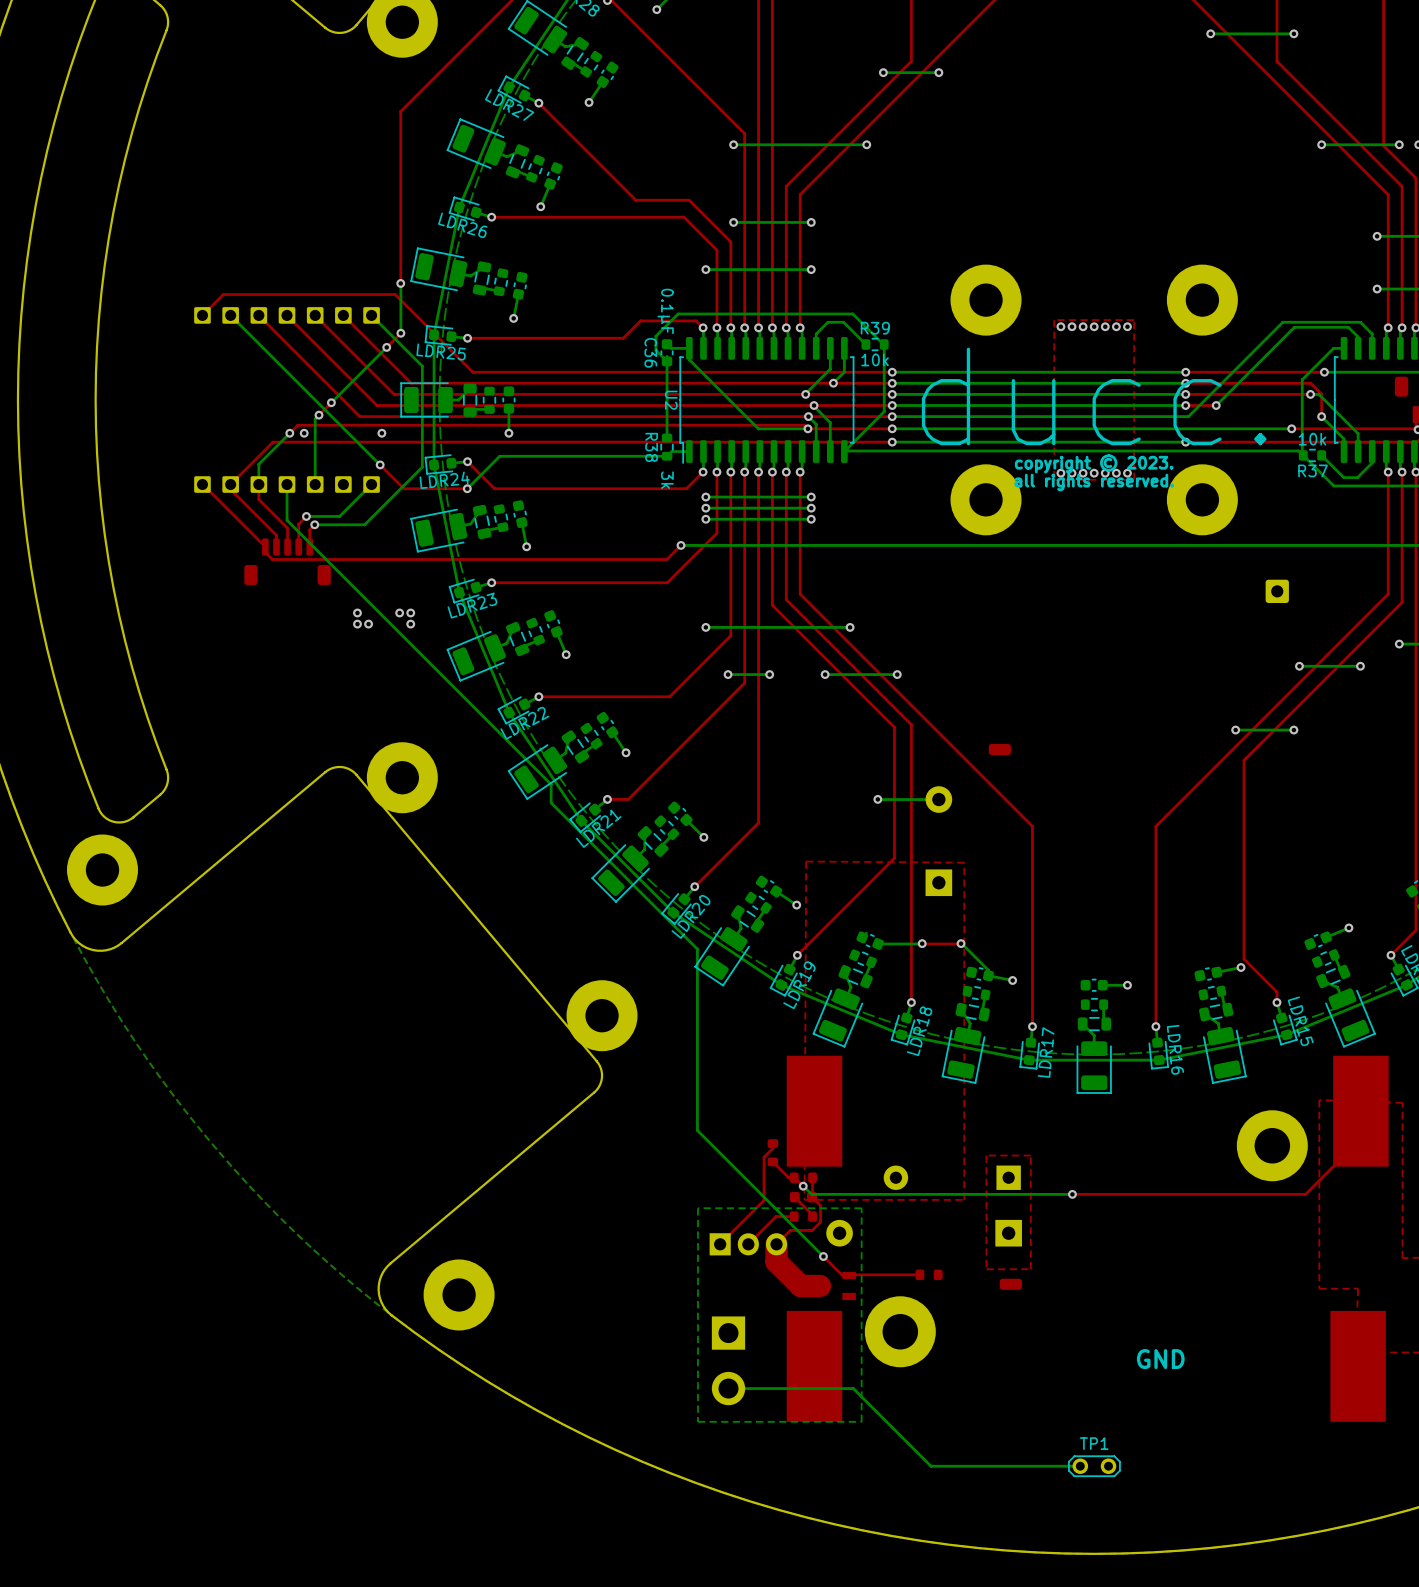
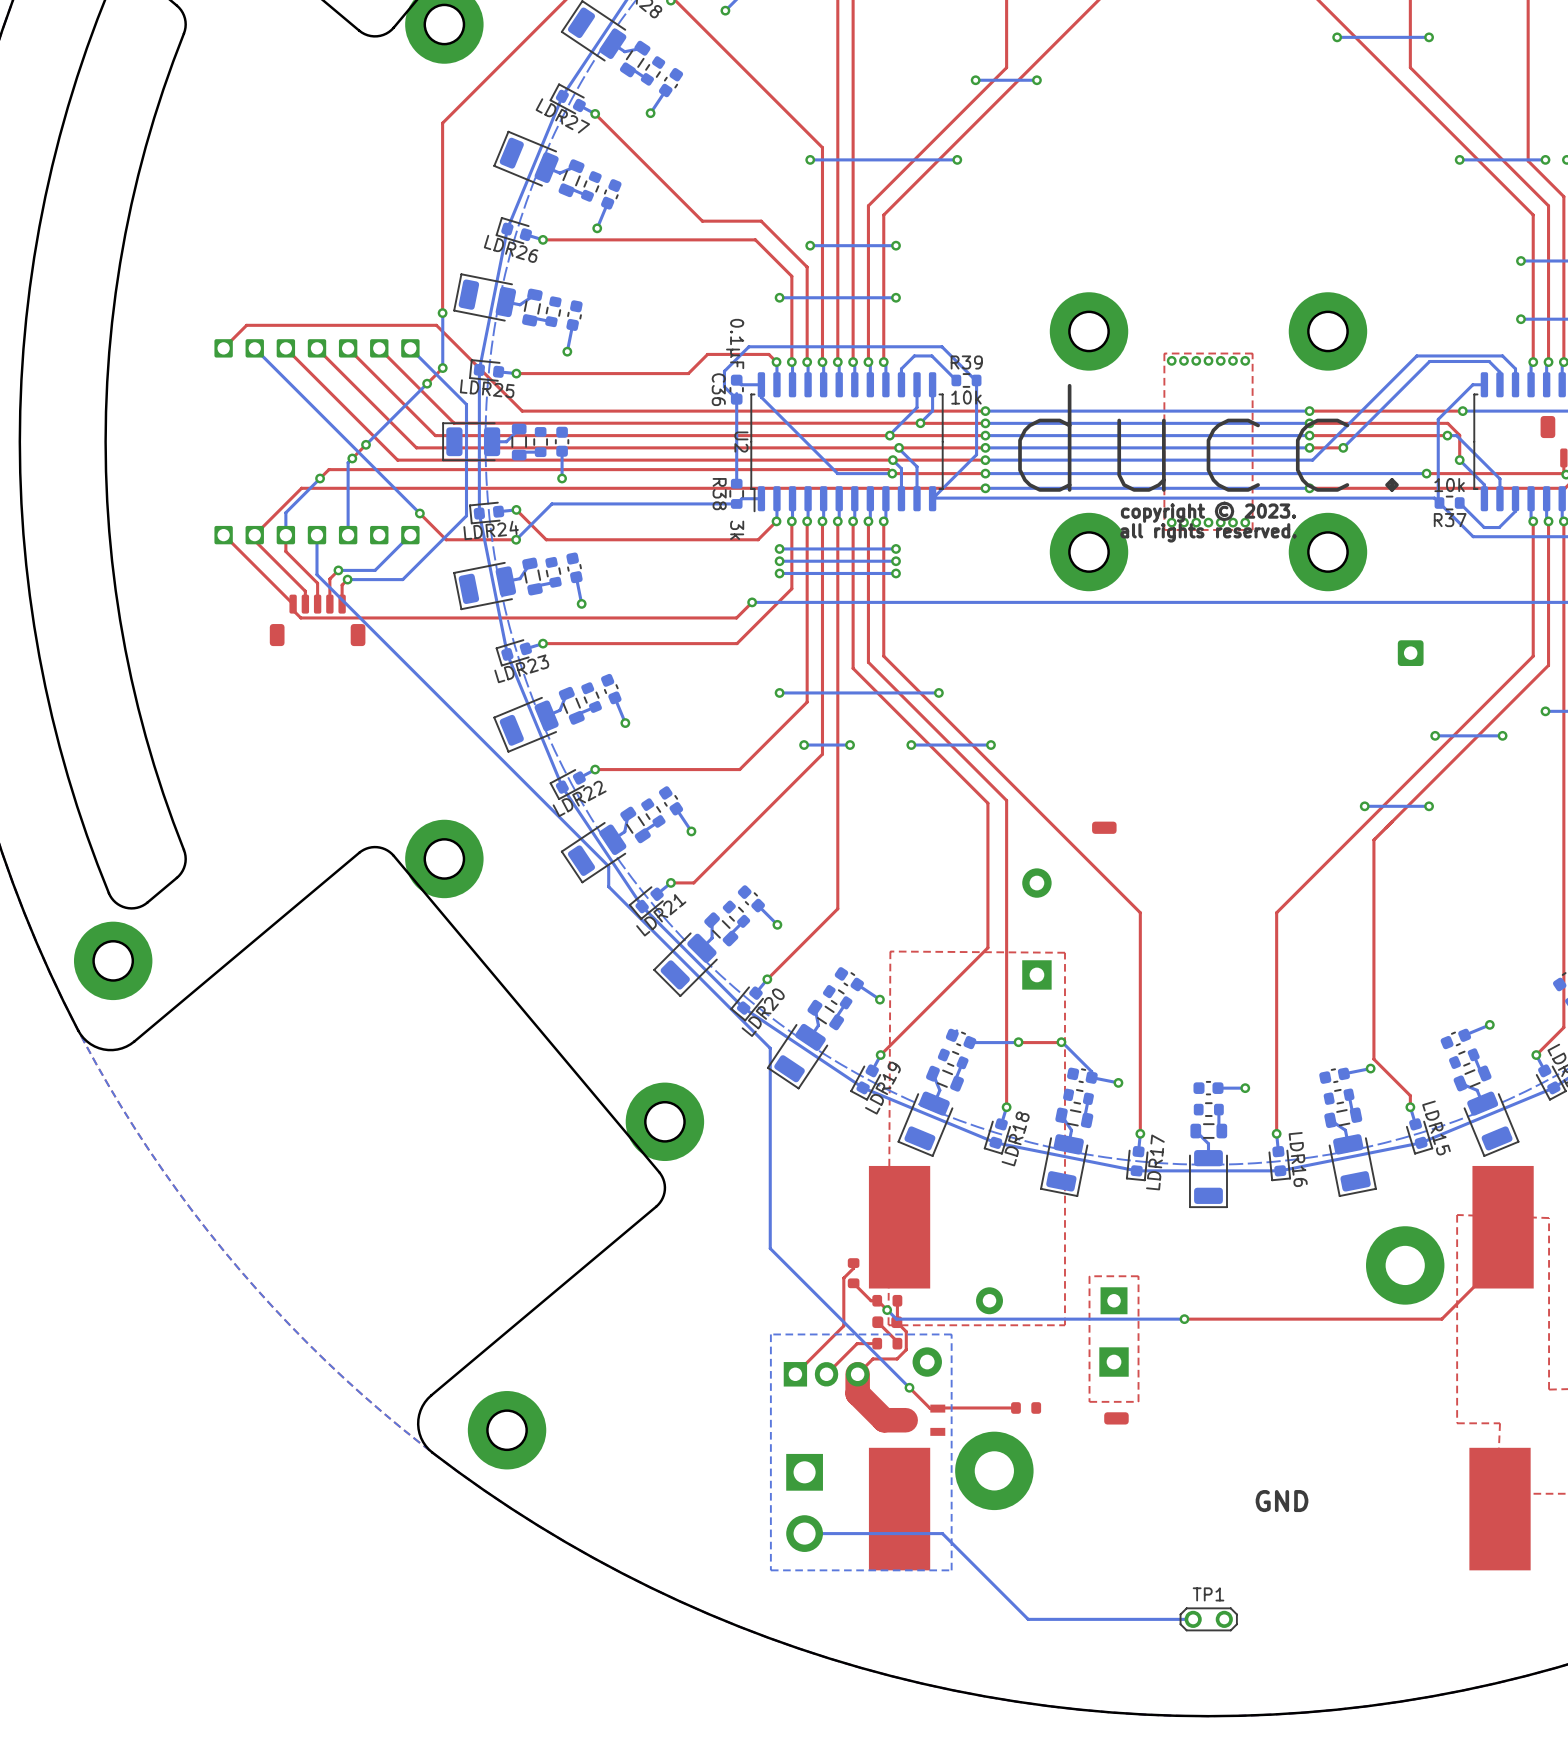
via: (304, 433) -> none
via: (381, 433) -> none
via: (357, 612) -> none
via: (399, 612) -> none
via: (410, 612) -> none
via: (357, 624) -> none
via: (368, 624) -> none
via: (410, 624) -> none
via: (877, 799) -> none
bottom track: (938, 799) (877, 799) -> none

